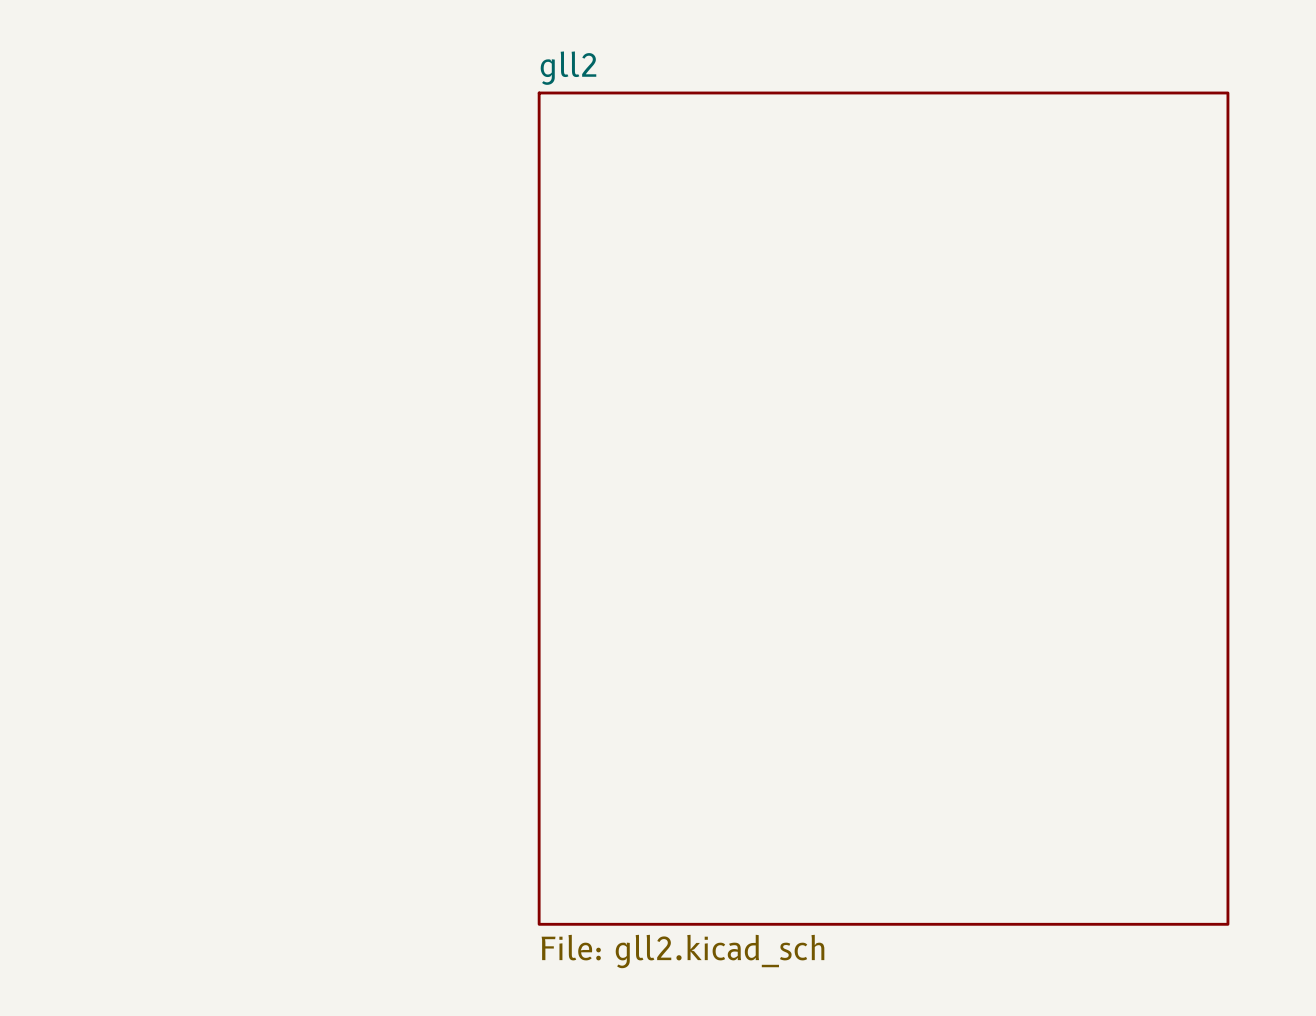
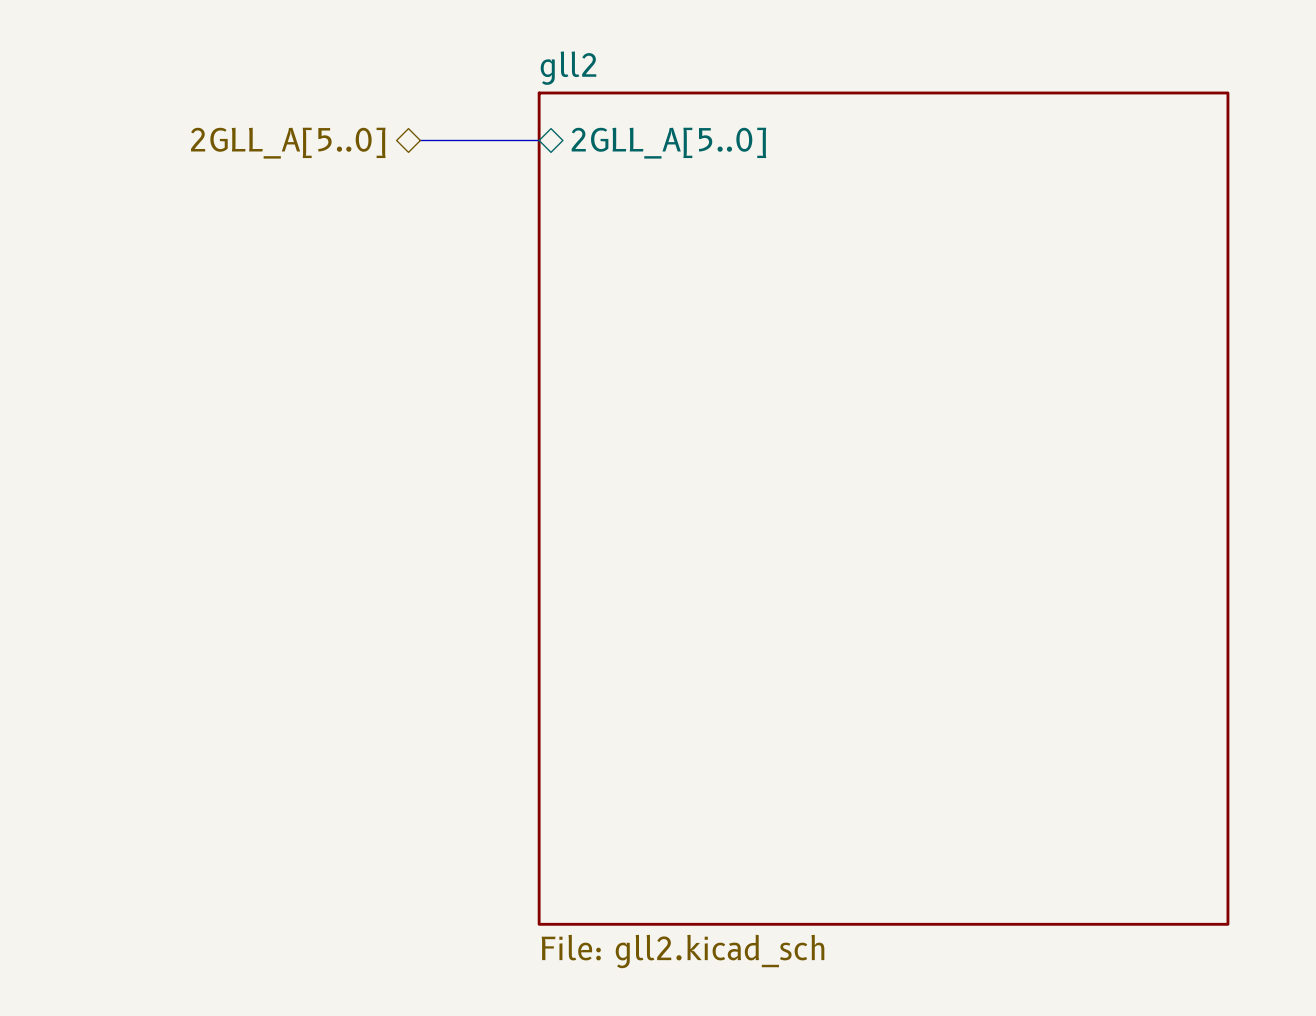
bus: none -> (420, 140) (539, 140)
hierarchical label: none -> 2GLL_A[5..0] (288, 143)
sheet pin: none -> 2GLL_A[5..0] (668, 143)

